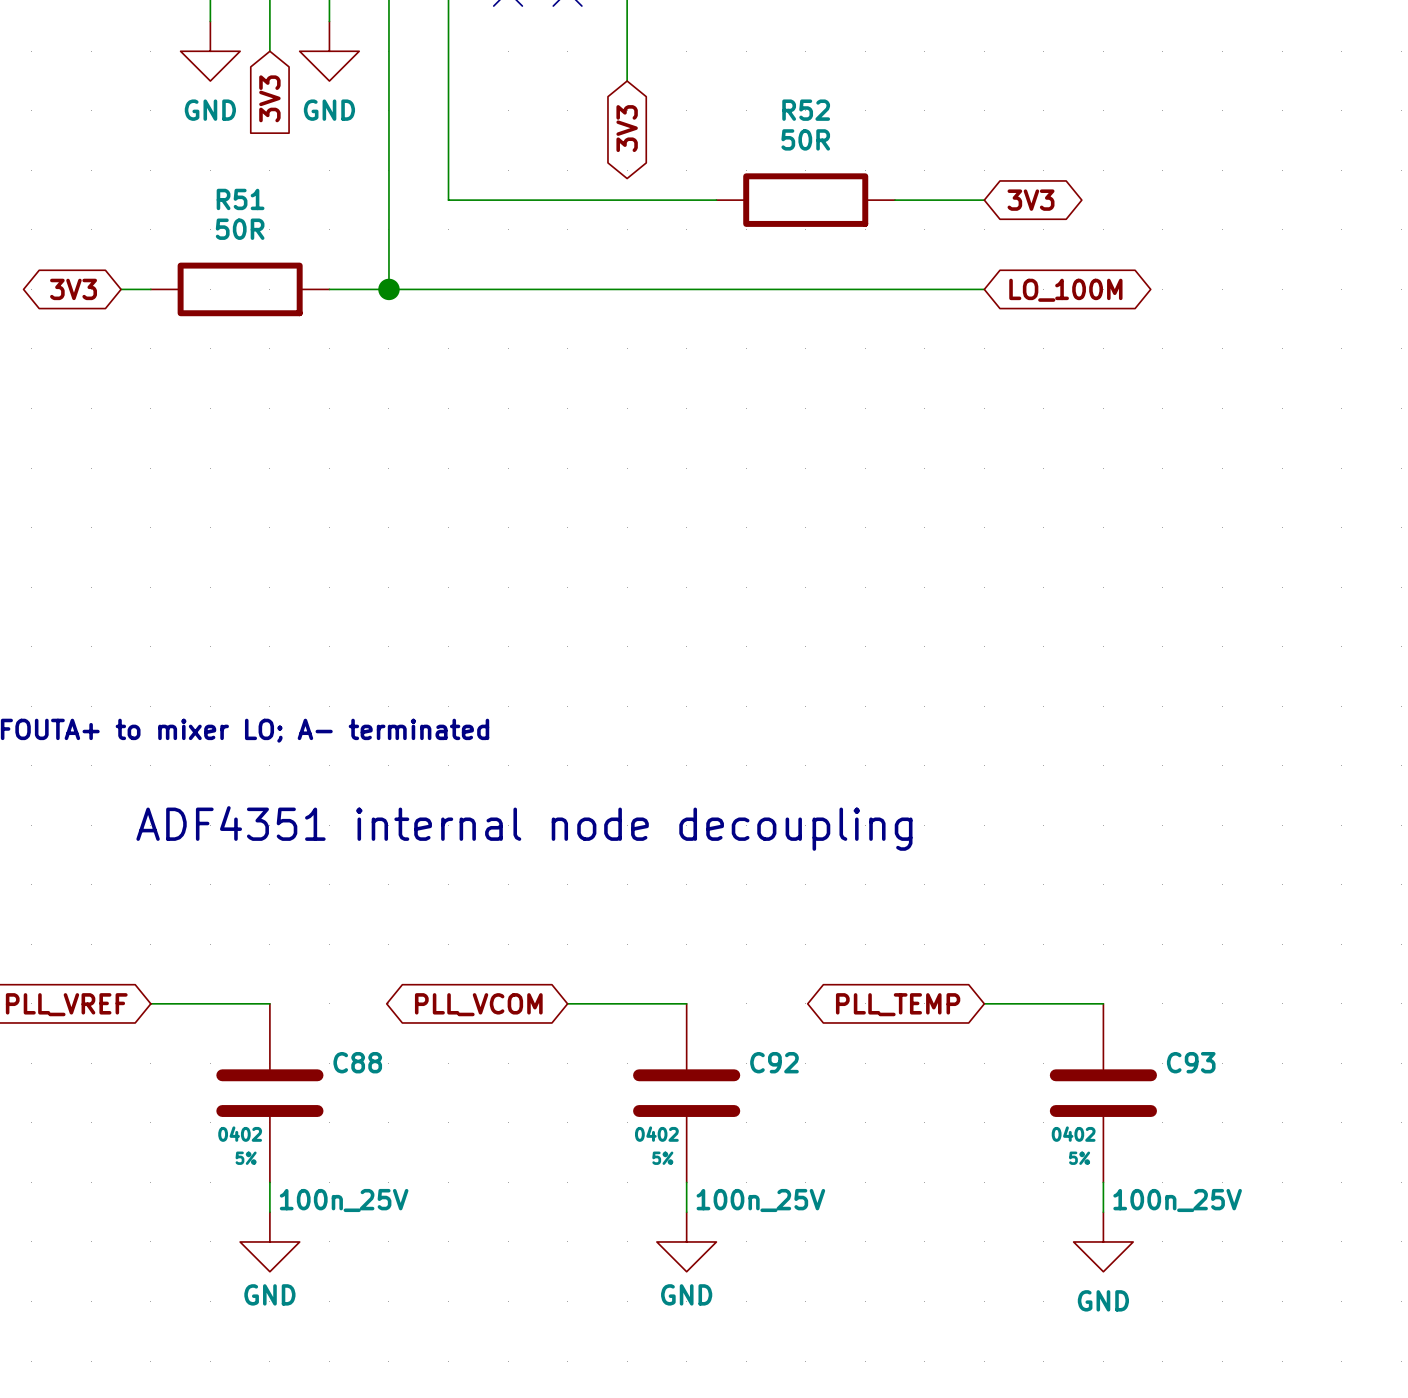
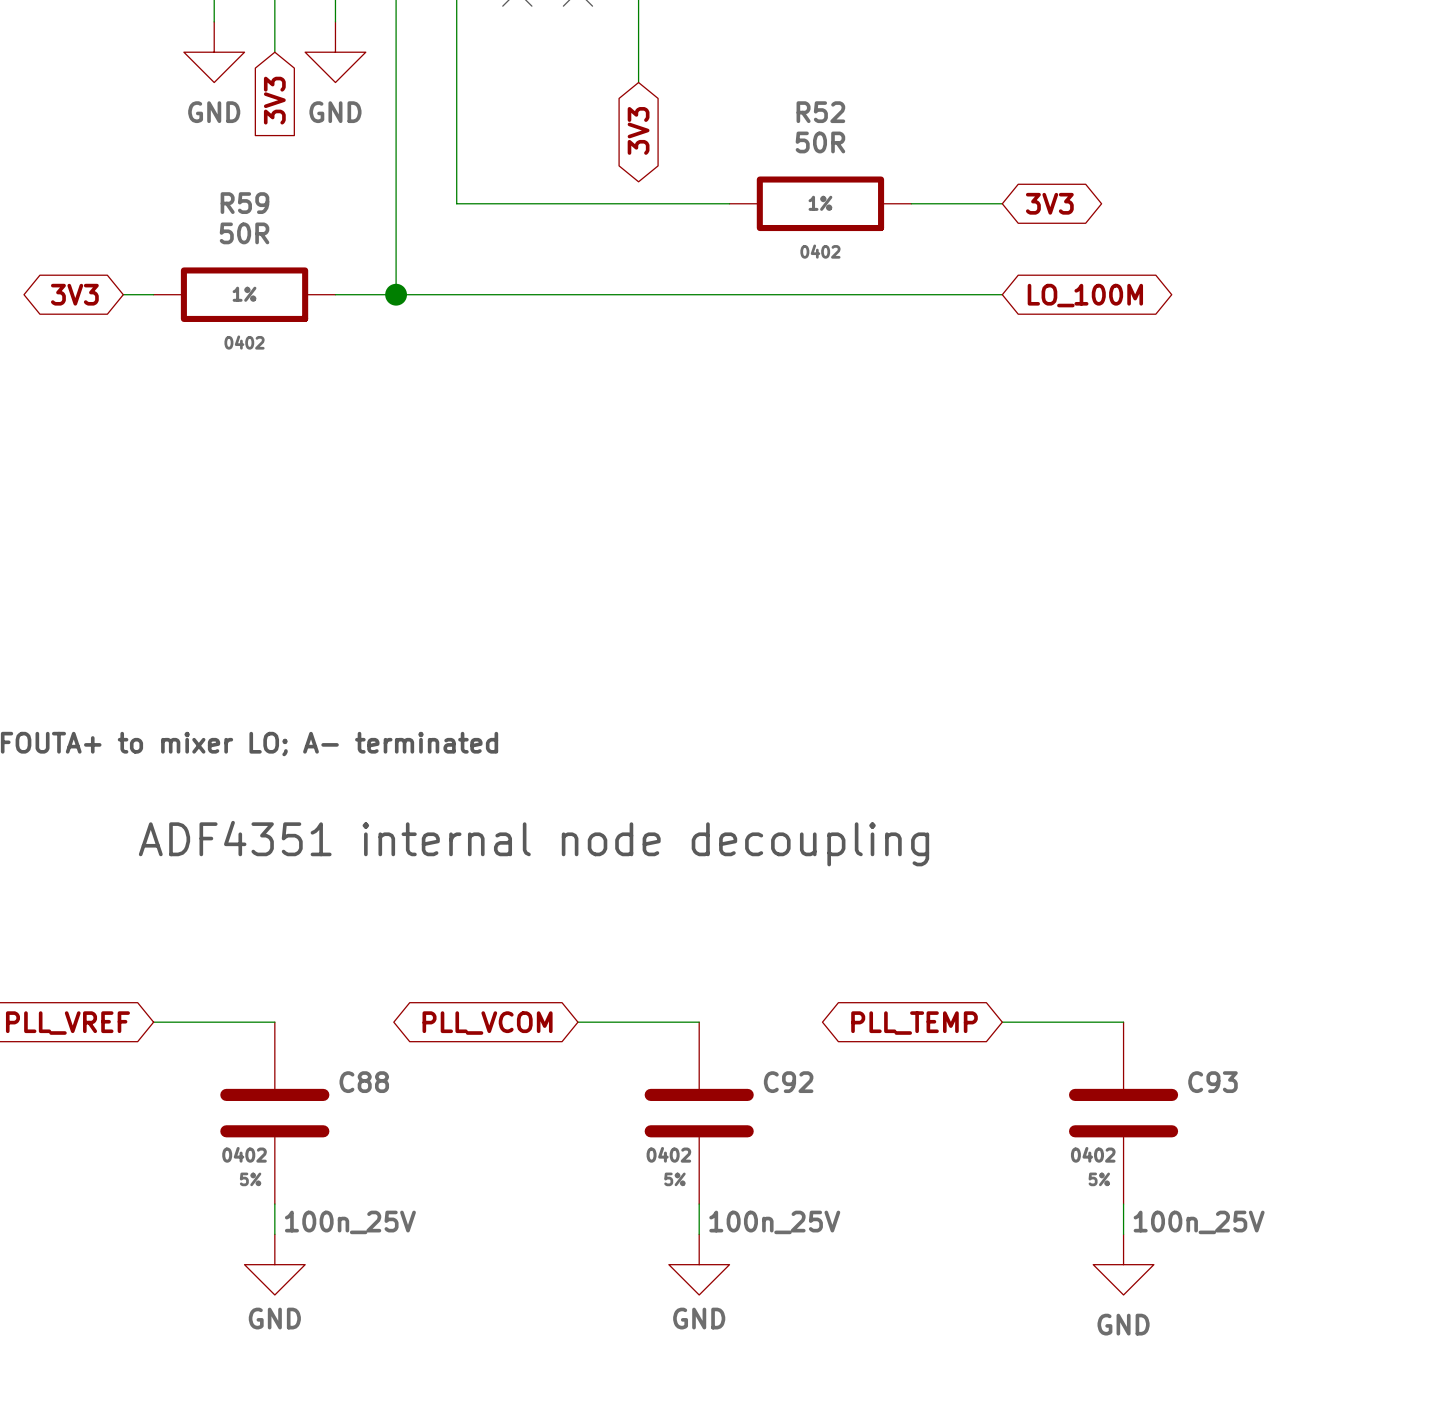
R51 name: R51 (240, 199) -> R59 (244, 203)
R52 text: none -> 1% (820, 203)
R52 text: none -> 0402 (820, 251)
R51 text: none -> 1% (244, 294)
R51 text: none -> 0402 (244, 342)

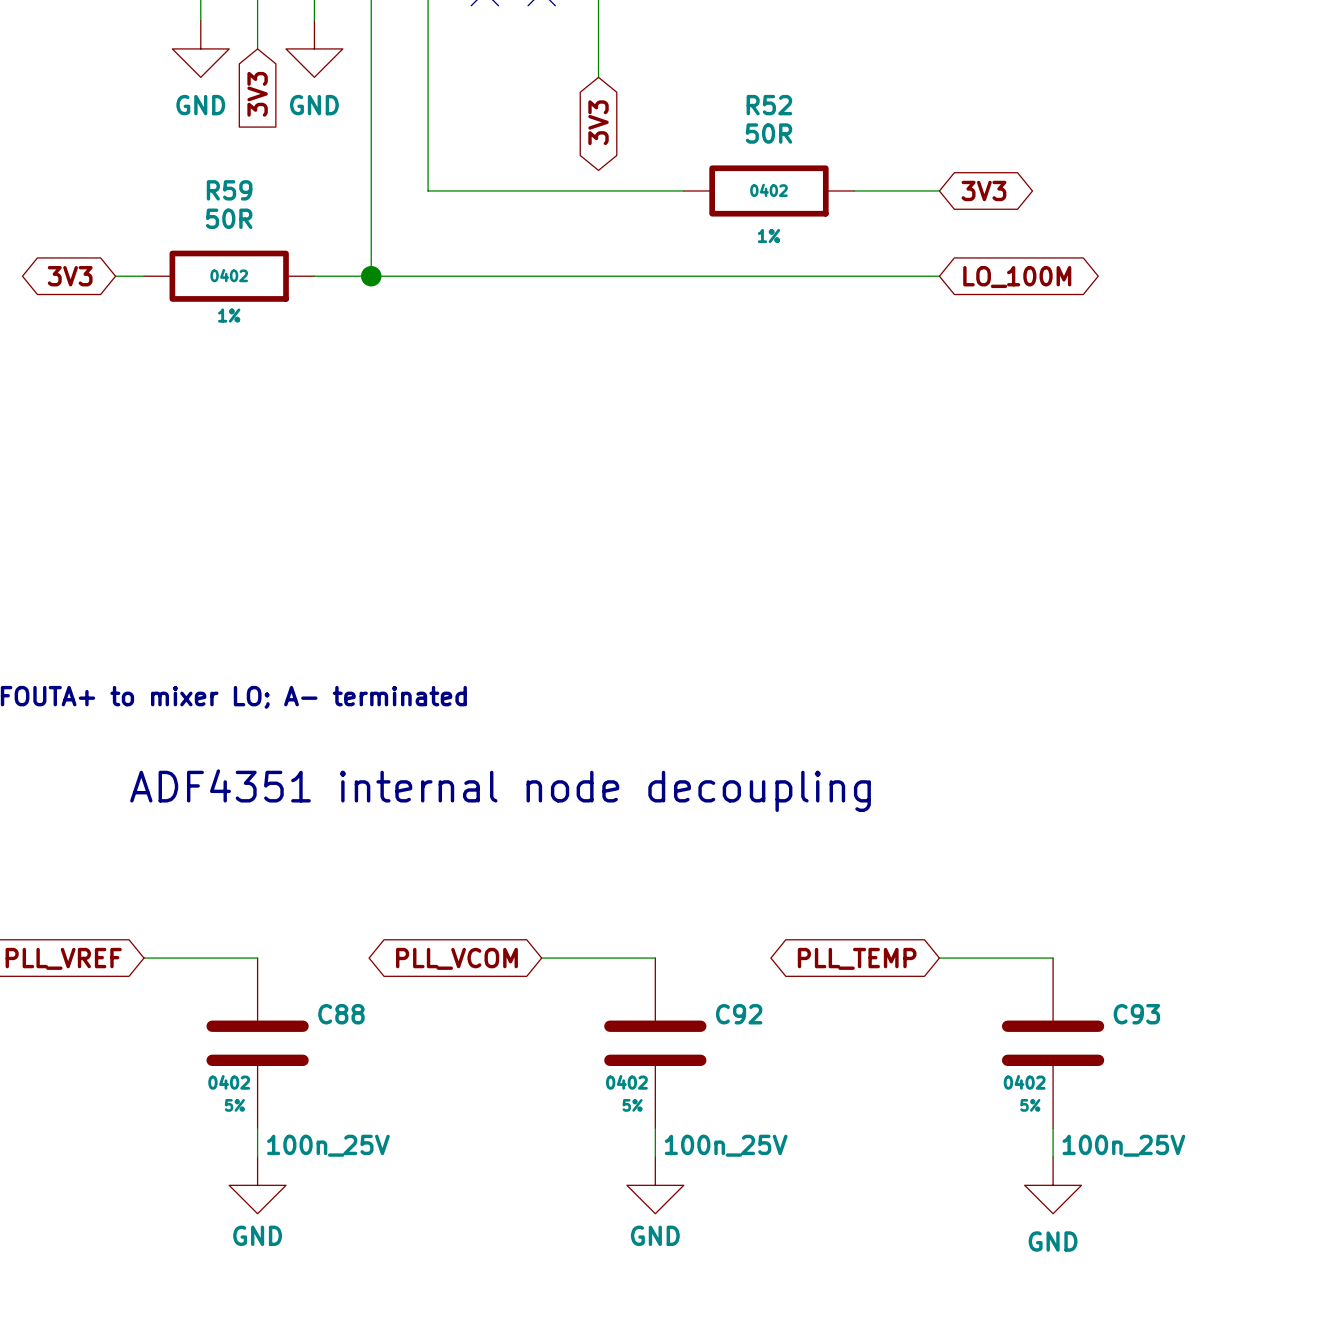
R52 text position: 1% (820, 203) -> 1% (768, 236)
R52 text position: 0402 (820, 251) -> 0402 (768, 190)
R59 text position: 1% (244, 294) -> 1% (229, 315)
R59 text position: 0402 (244, 342) -> 0402 (229, 275)

